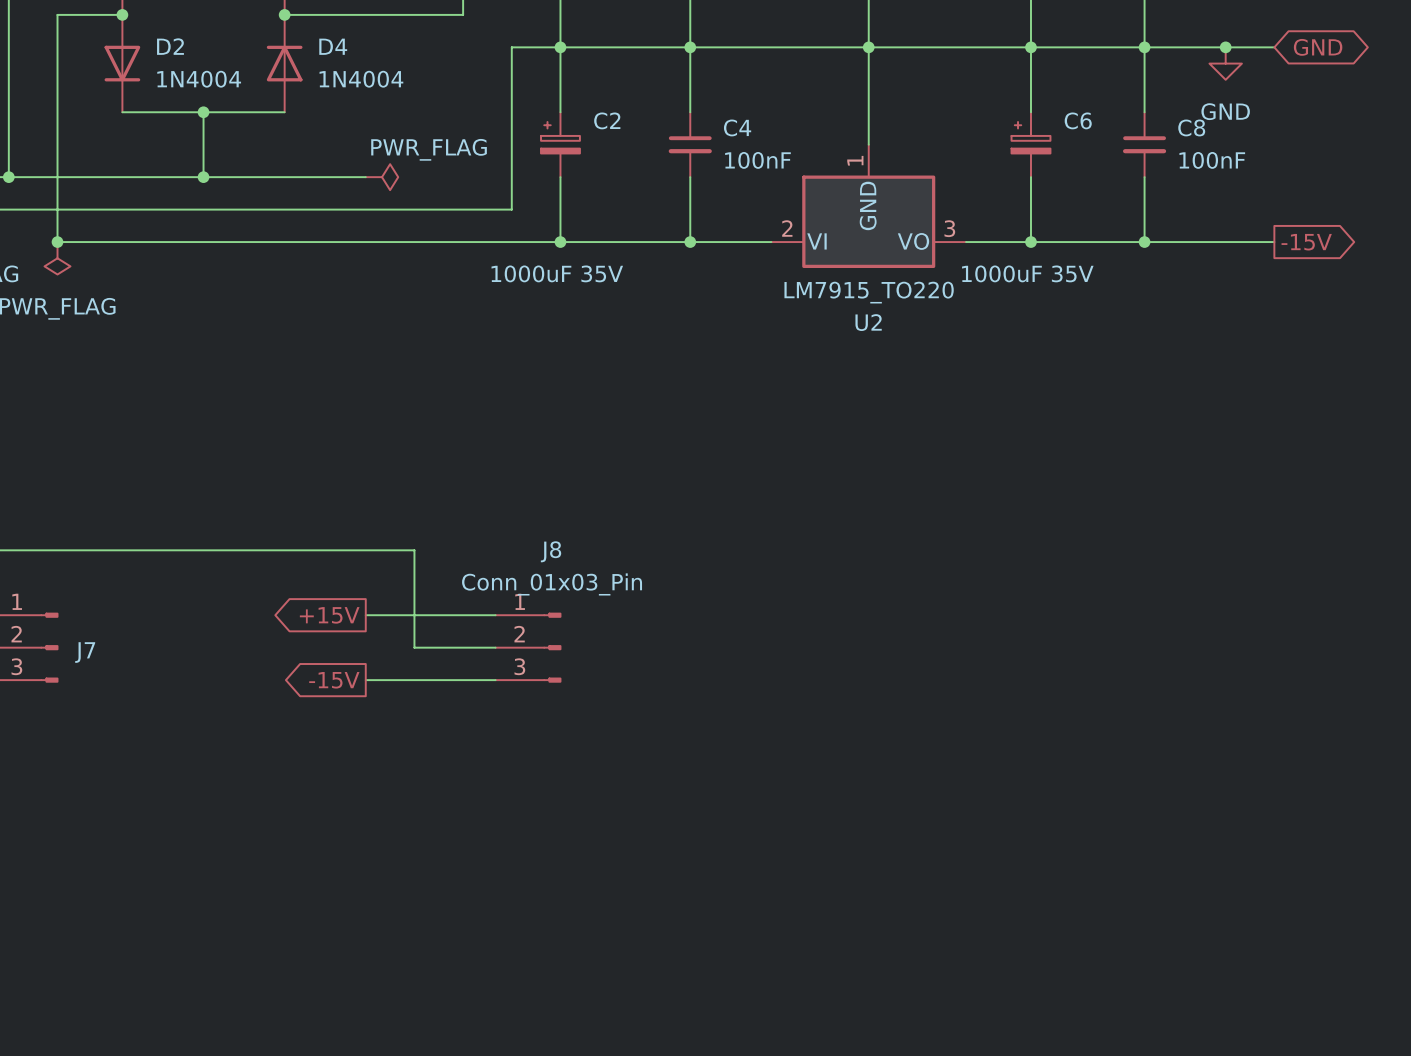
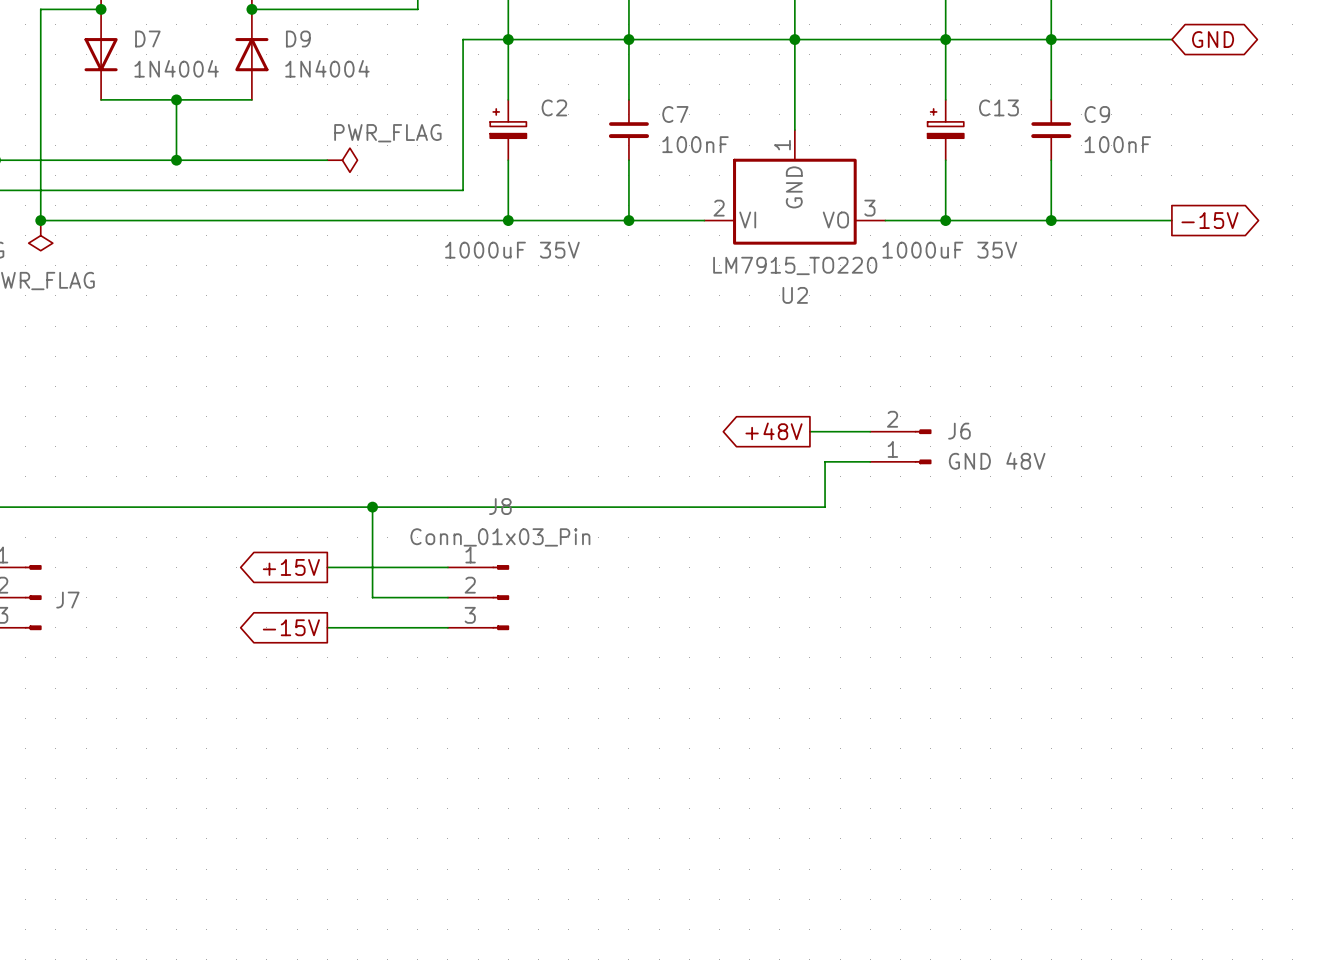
D2 name: D2 (170, 46) -> D7 (147, 38)
D4 name: D4 (333, 46) -> D9 (298, 38)
junction: (1225, 47) -> none
power symbol: GND (1225, 63) -> none
C6 name: C6 (1078, 120) -> C13 (998, 107)
C4 name: C4 (737, 127) -> C7 (675, 114)
C8 name: C8 (1191, 127) -> C9 (1097, 114)
global label: none -> +48V (774, 431)
wire: none -> (809, 431) (870, 431)
J6: none -> GND 48V (900, 446)
wire: none -> (870, 461) (825, 461) (825, 507) (372, 507)
junction: none -> (372, 507)

